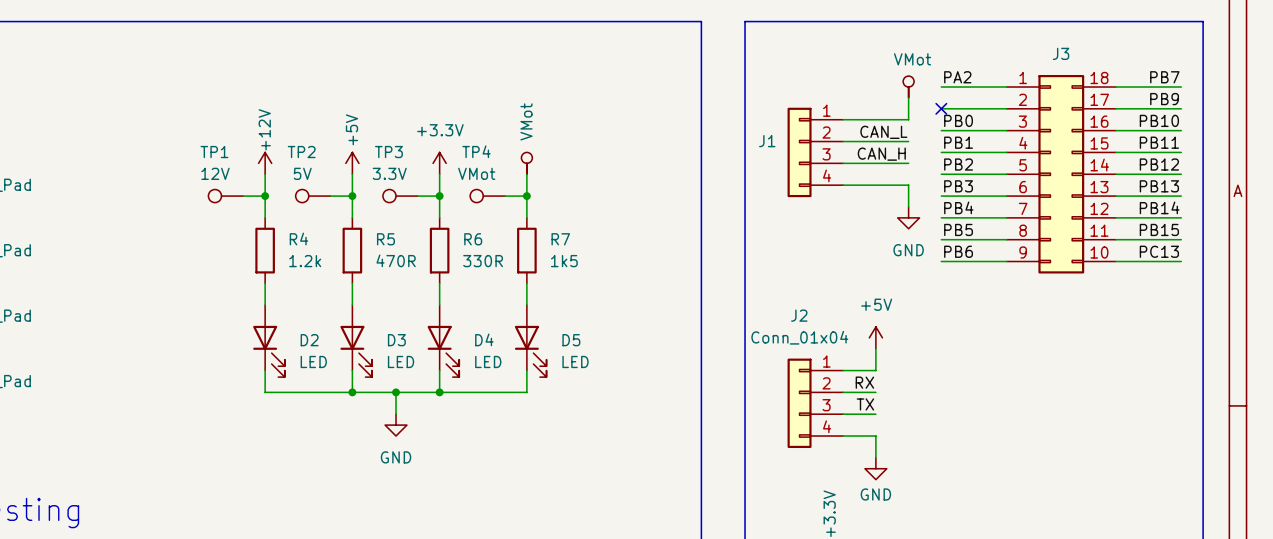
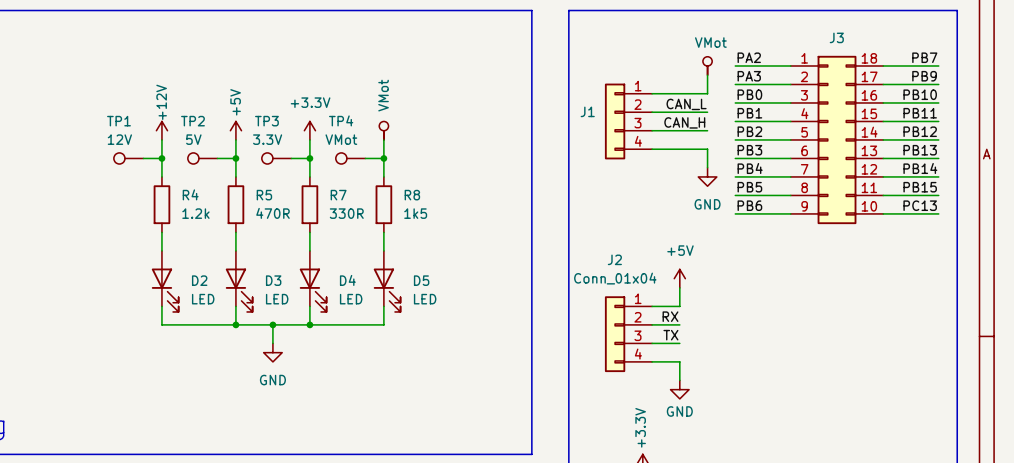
label: none -> PA3 (749, 76)
no-connect mark: (941, 108) -> none
R6 name: R6 (473, 239) -> R7 (338, 195)
R7 name: R7 (560, 239) -> R8 (412, 195)

